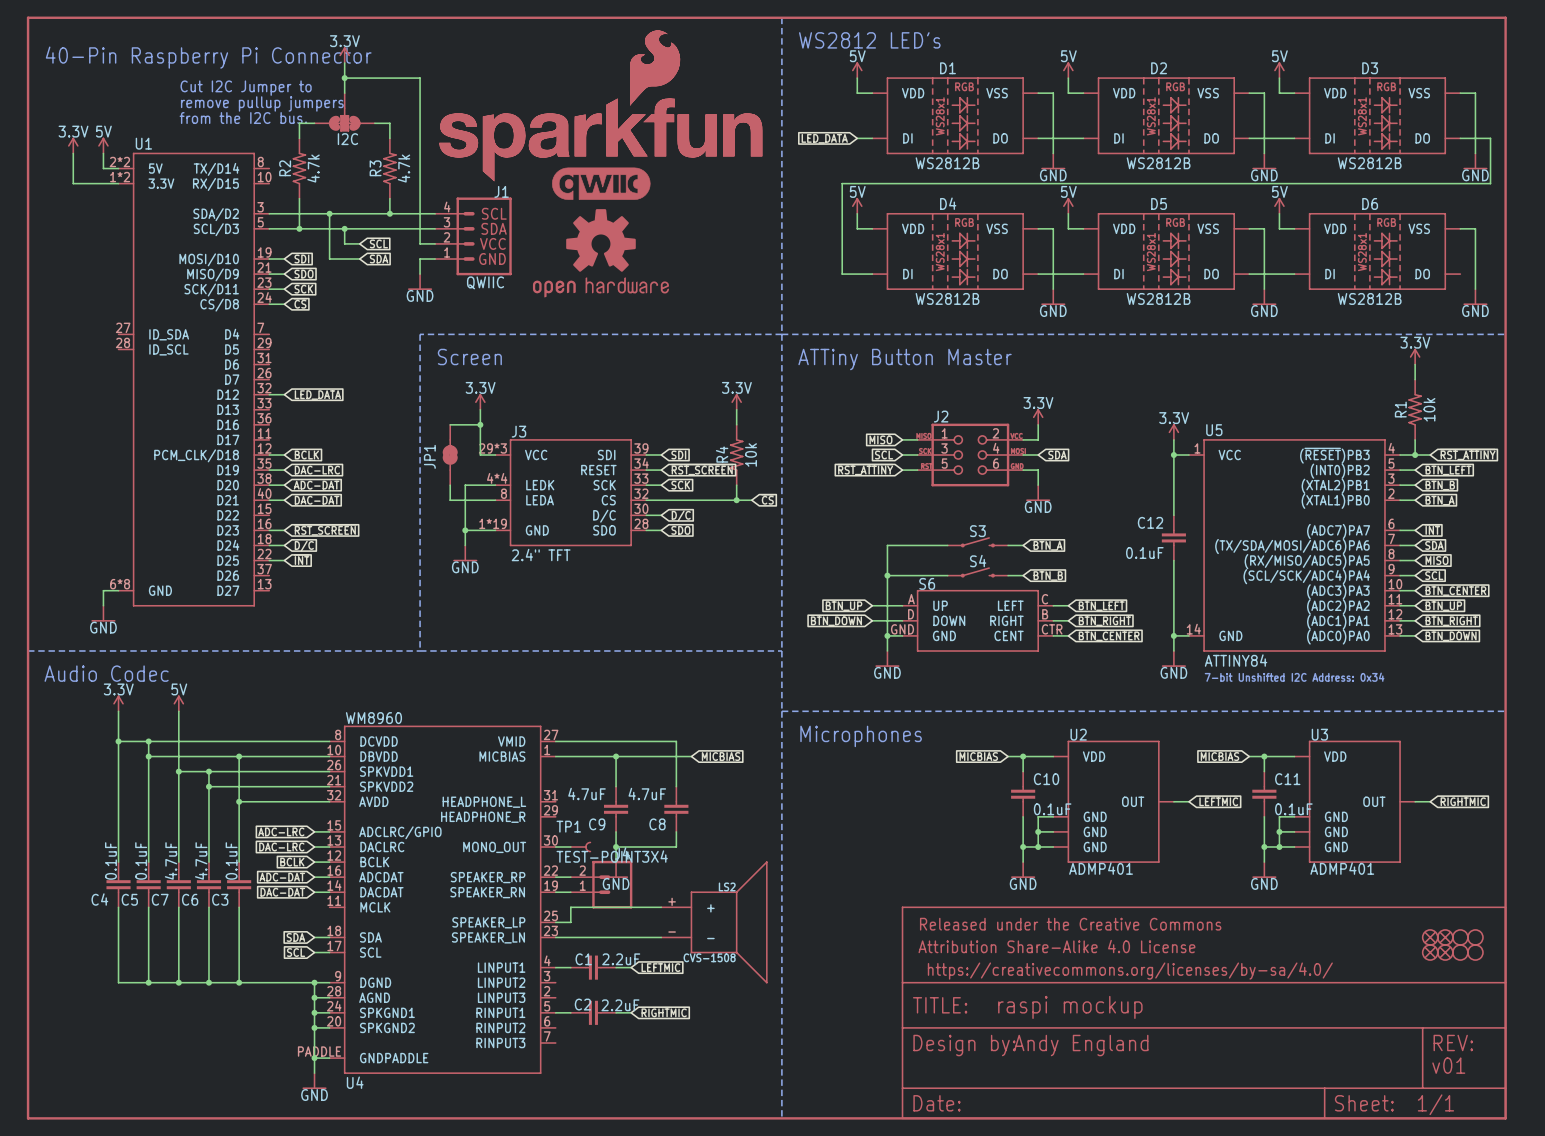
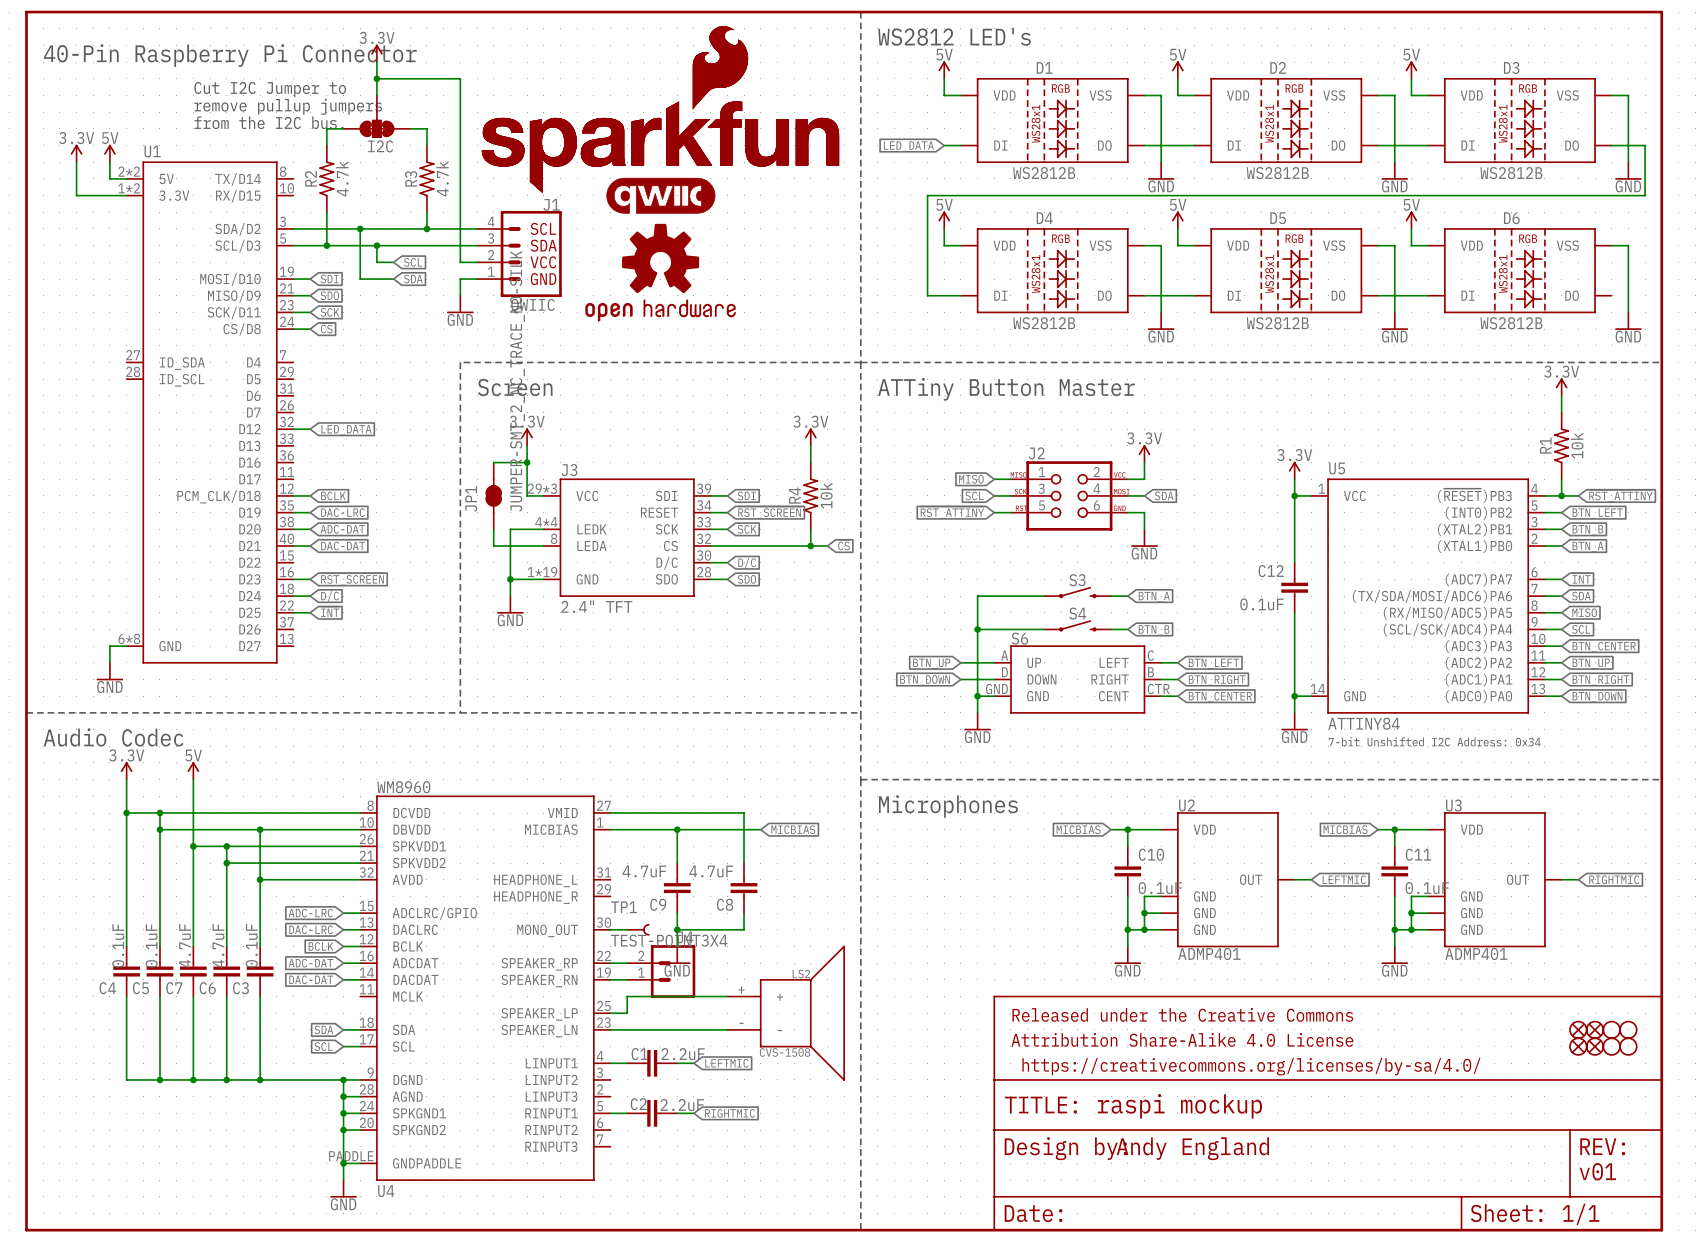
JP1 value: none -> JUMPER-SMT_2_NC_TRACE_NO-SILK (517, 381)

